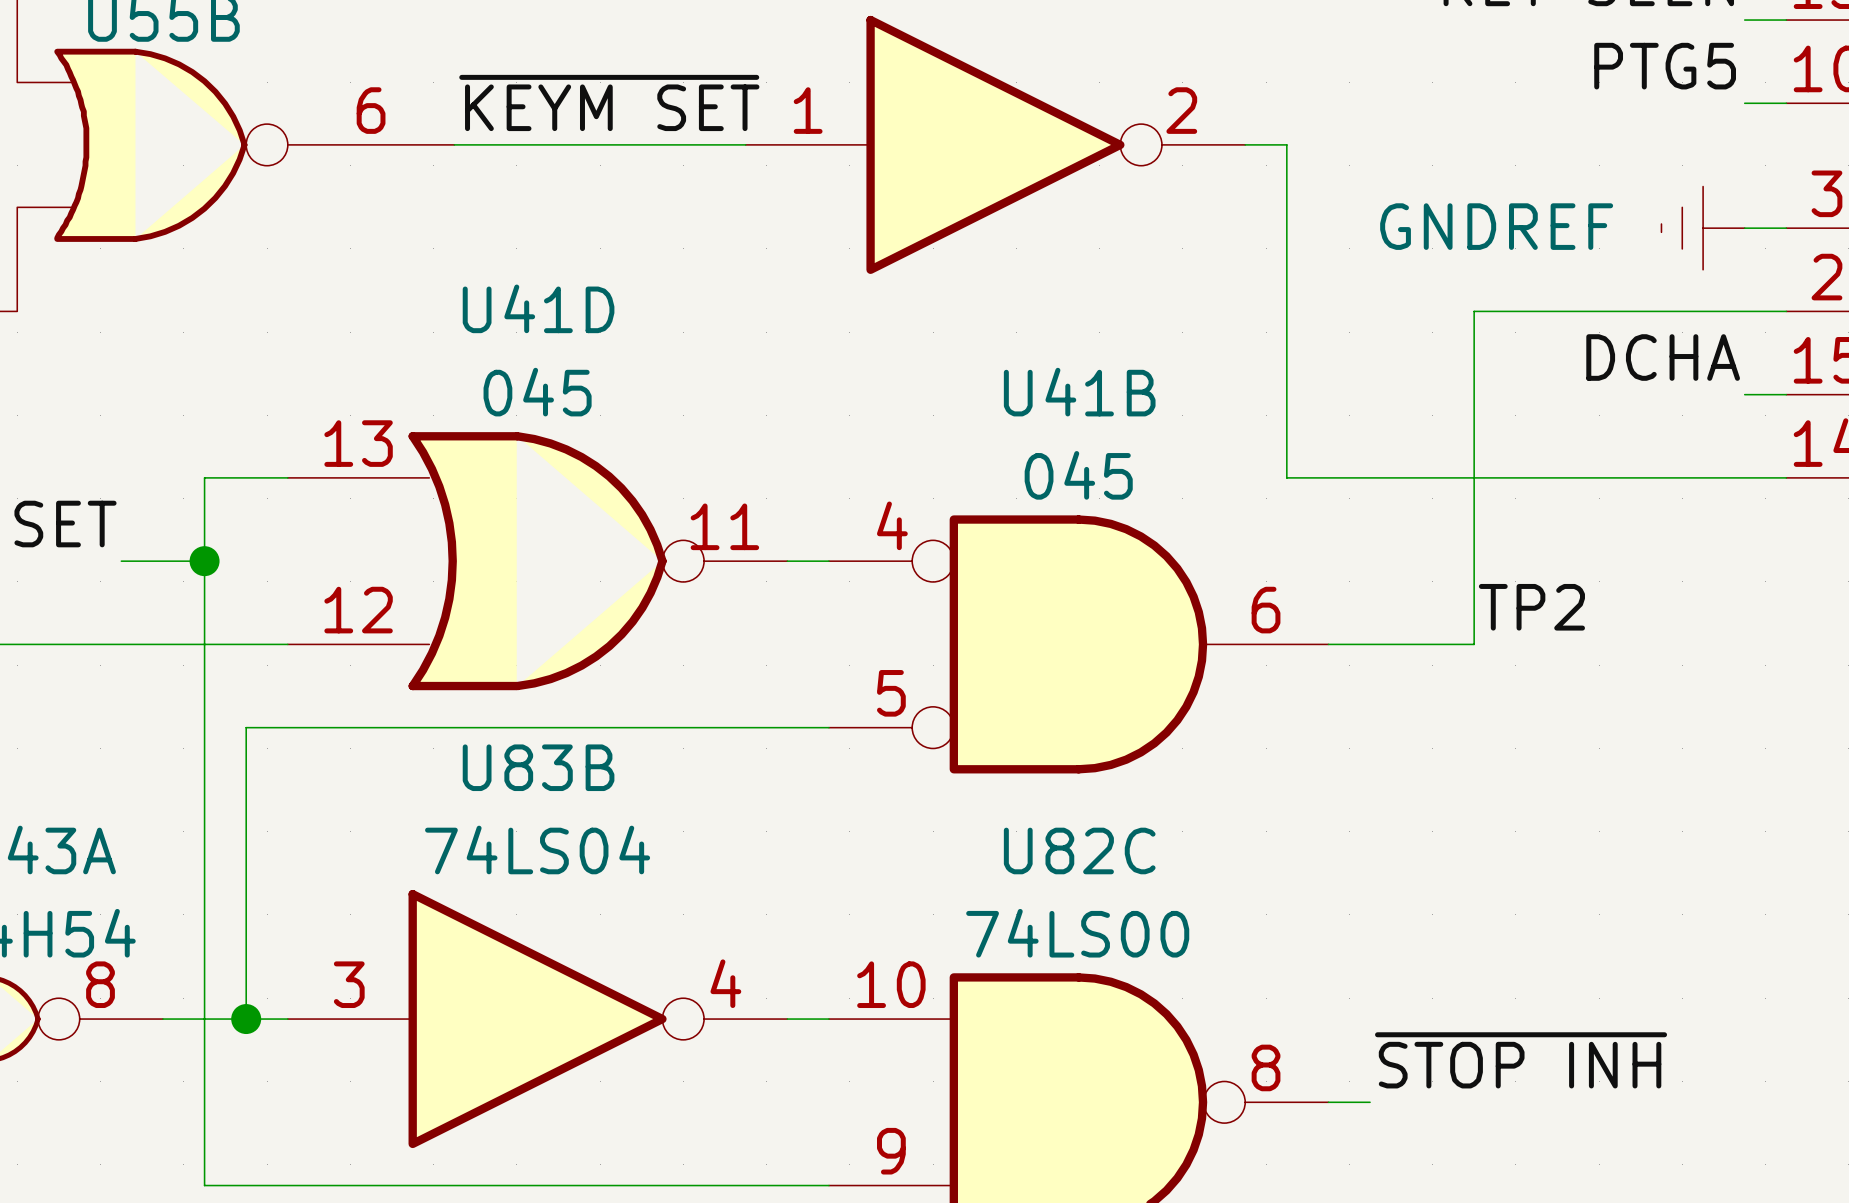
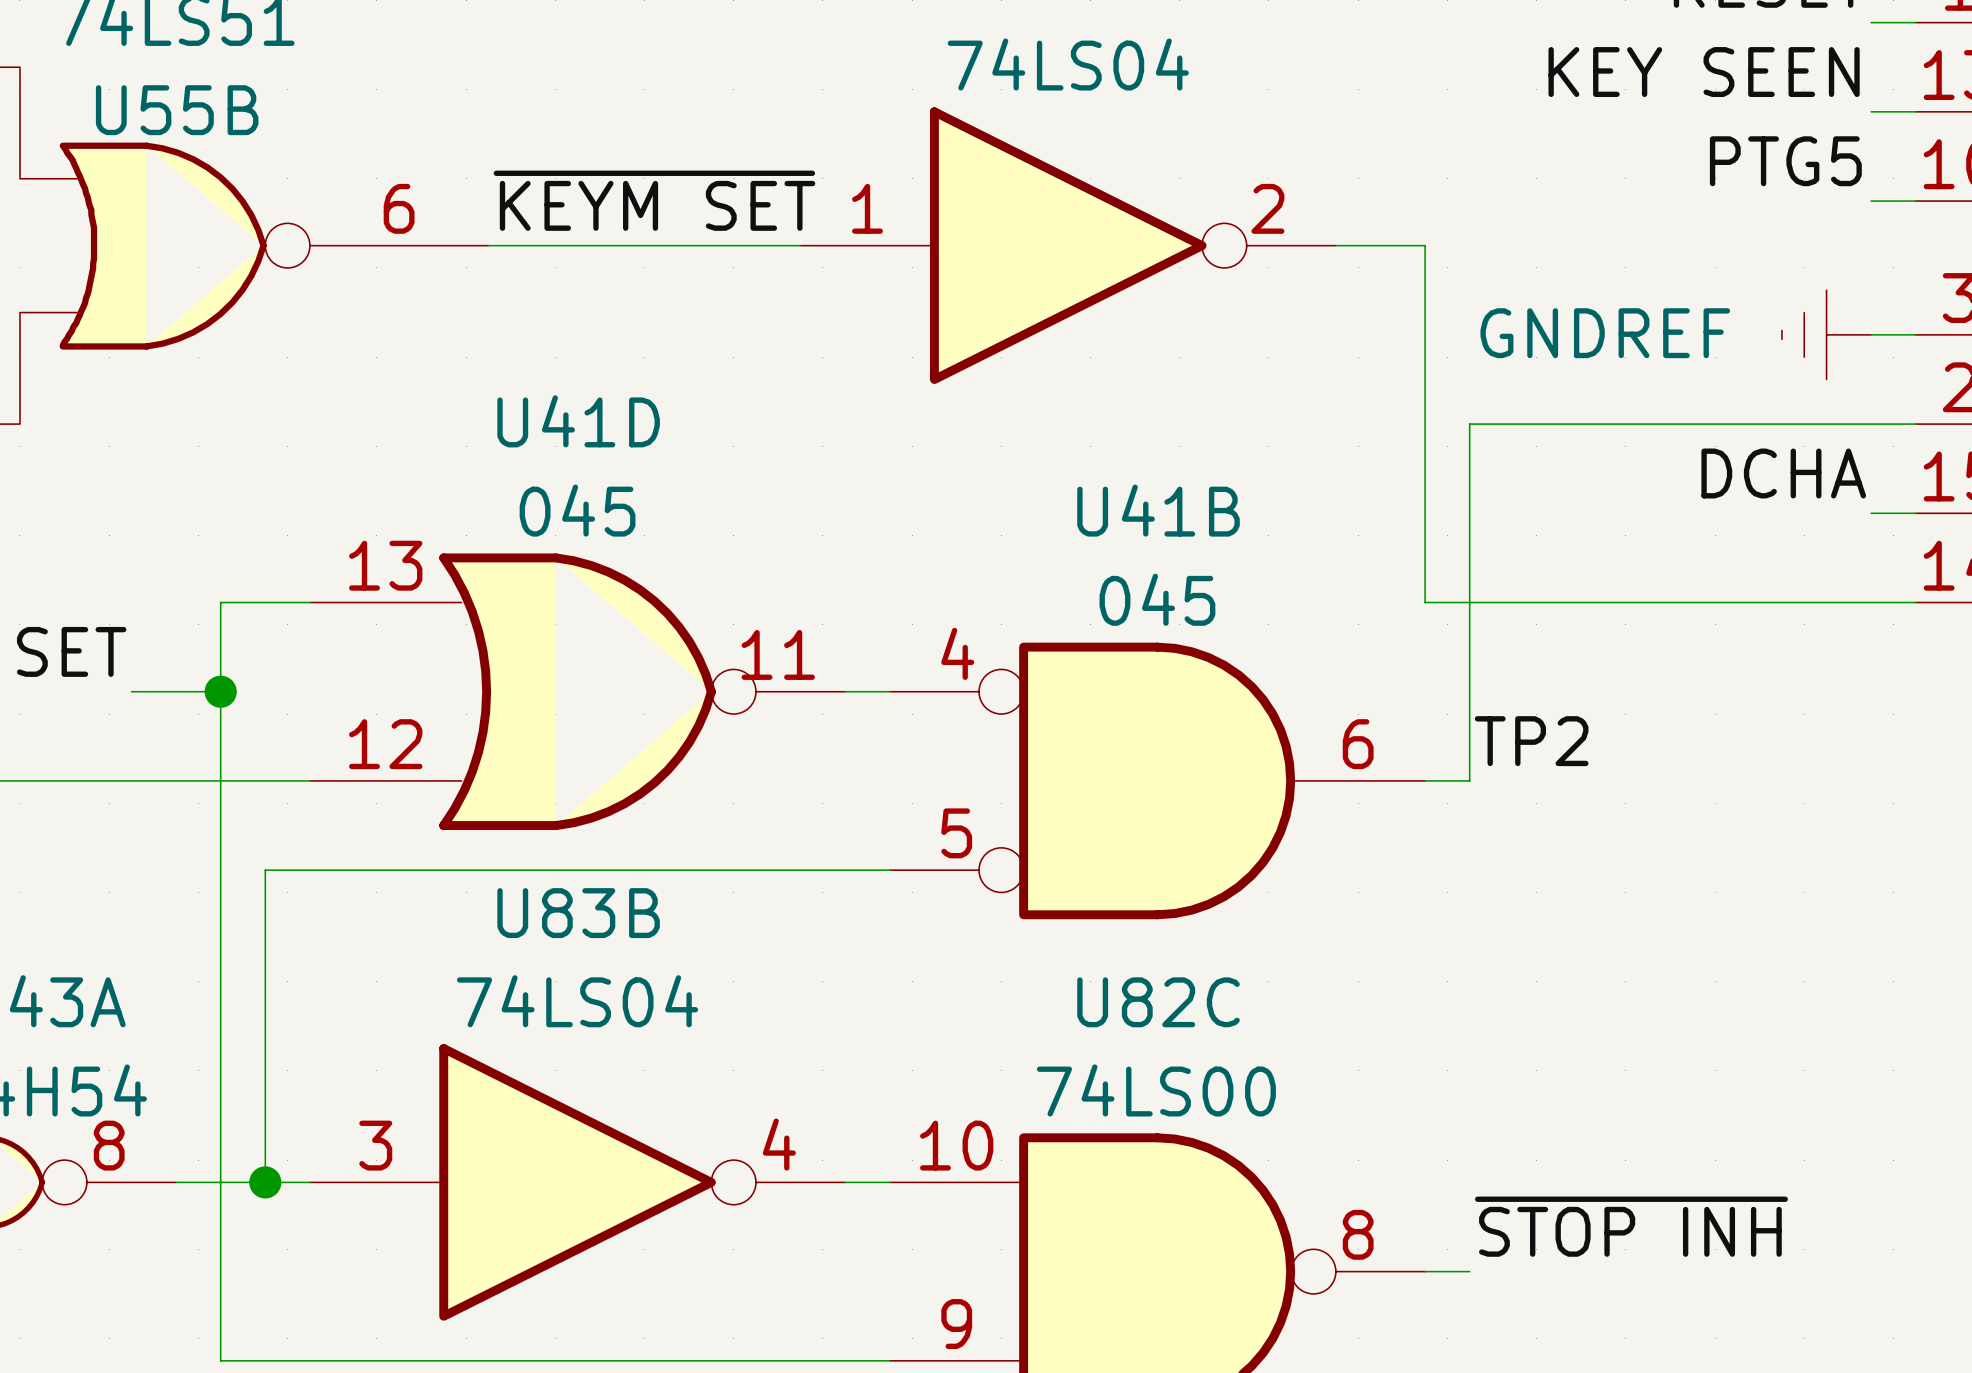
wire: (1286, 144) (1286, 477) (1328, 477) -> (1380, 245) (1425, 245) (1425, 602)
wire: (1474, 311) (1474, 644) (1370, 644) -> (1581, 424) (1469, 424) (1469, 780)
label position: TP2 (1531, 607) -> TP2 (1531, 741)

